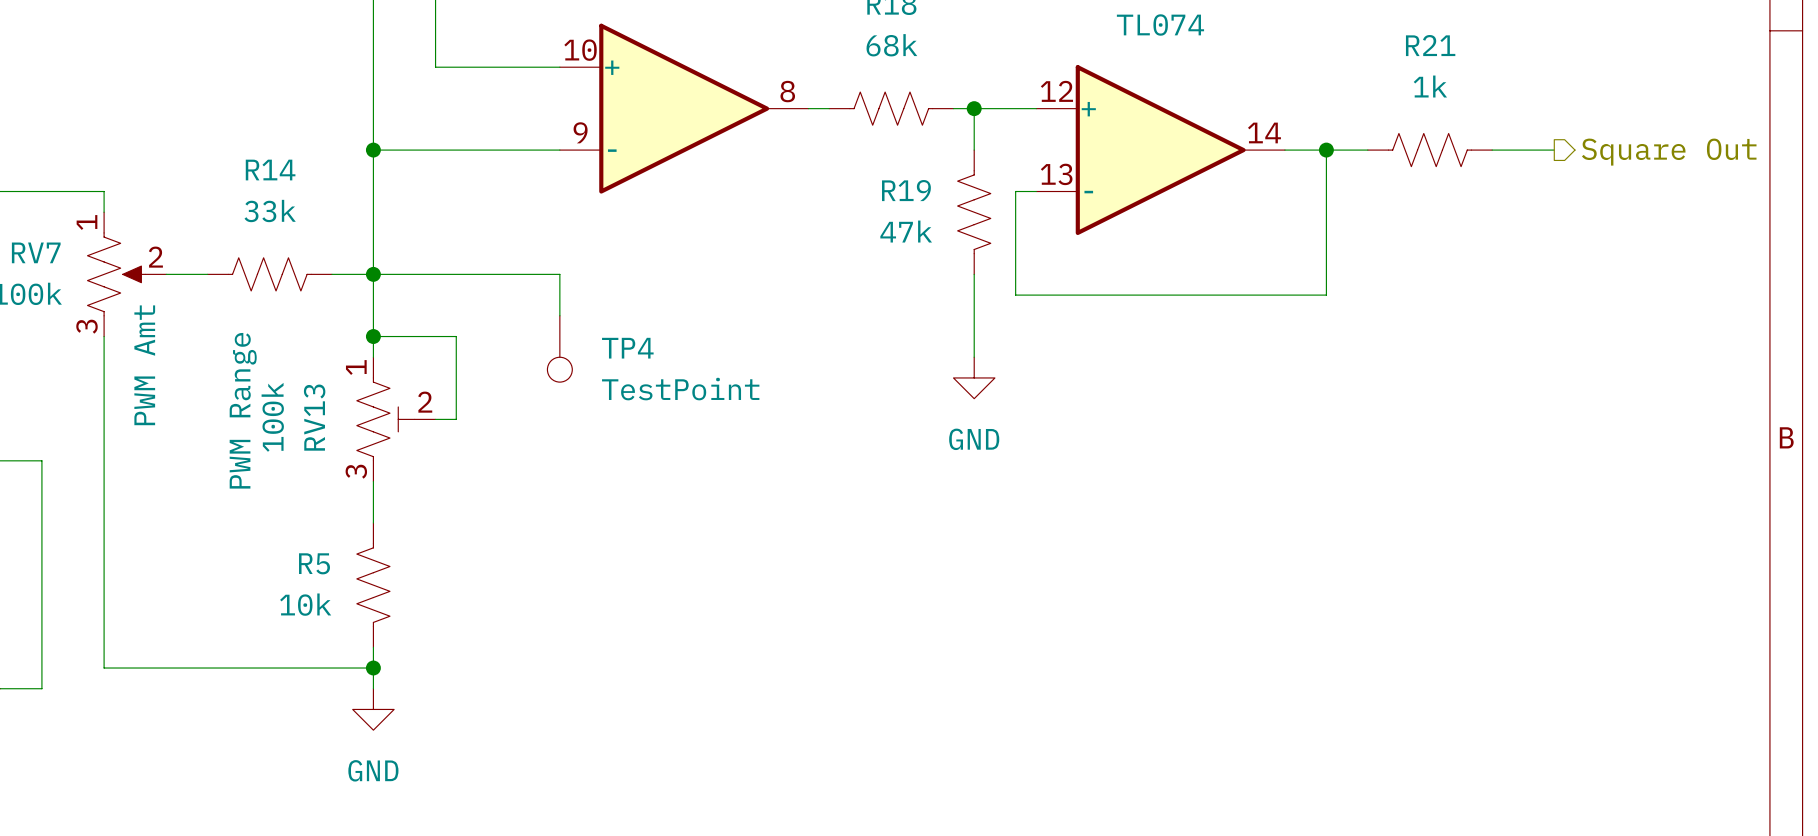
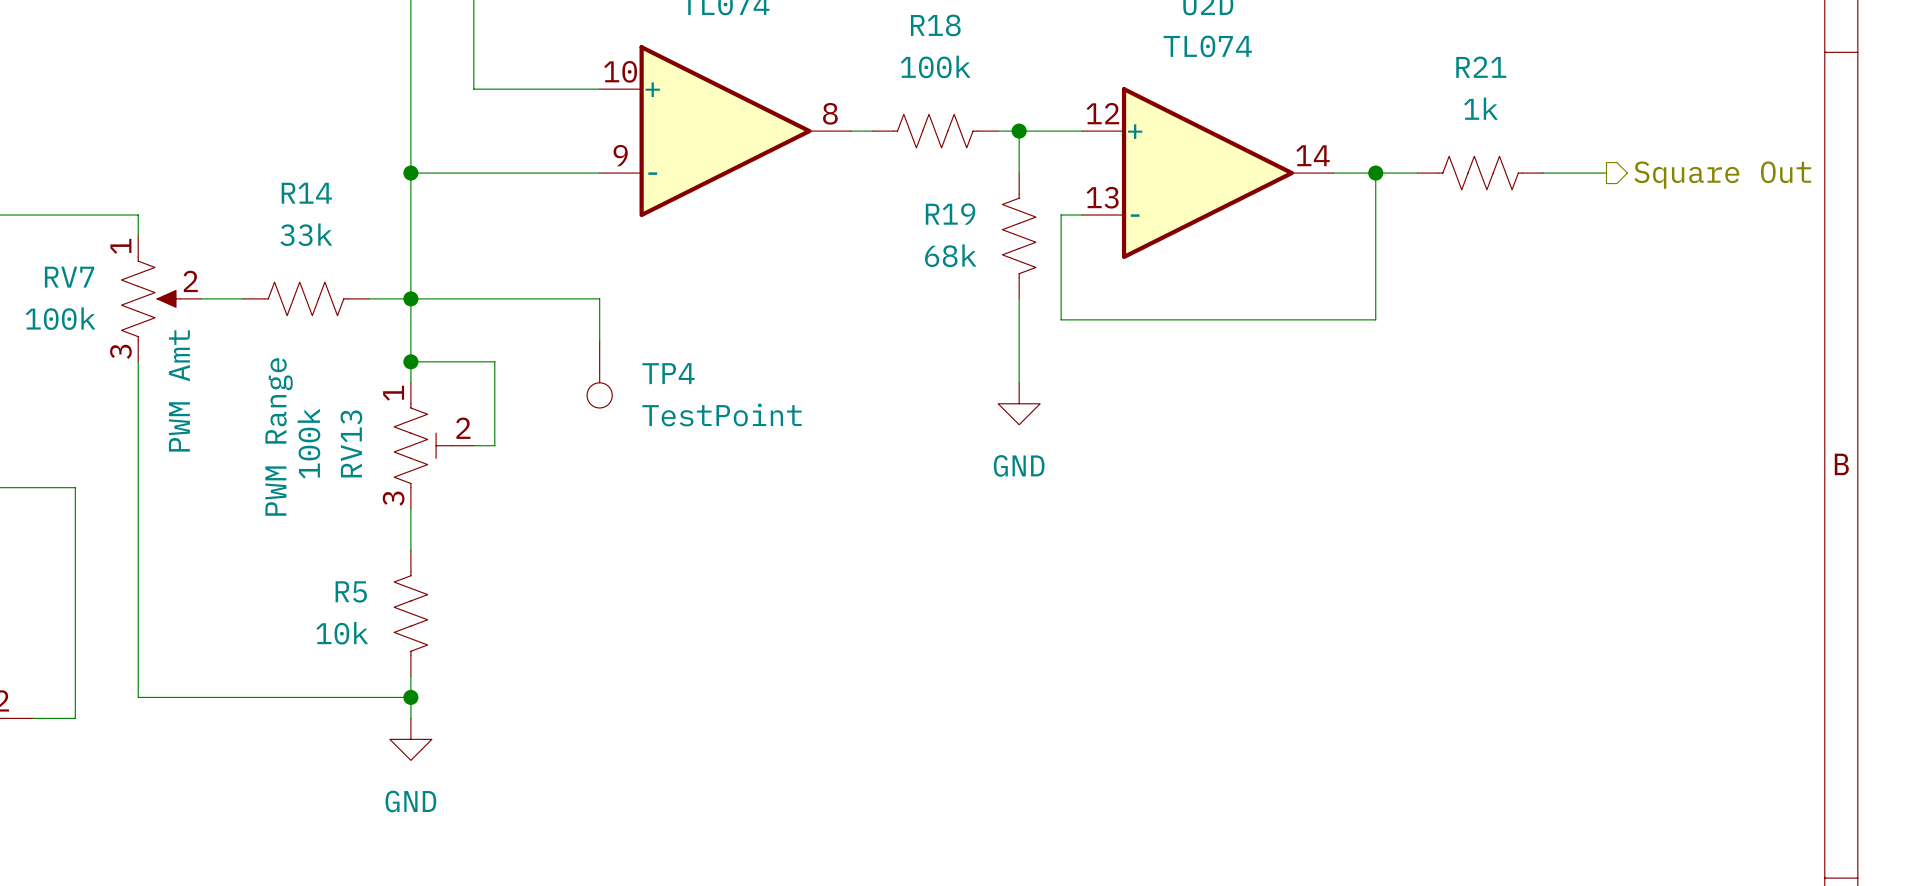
R18 value: 68k (891, 45) -> 100k (935, 66)
R19 value: 47k (906, 231) -> 68k (950, 255)

